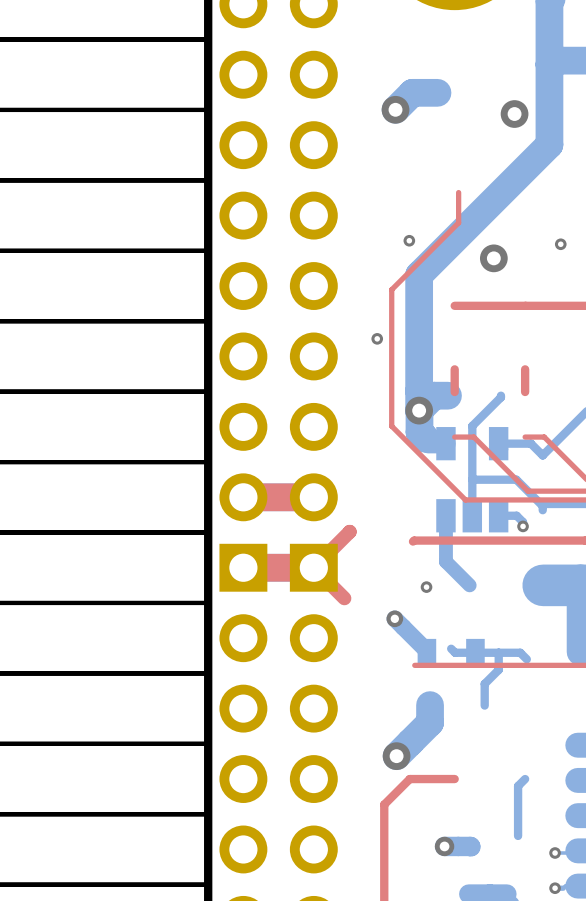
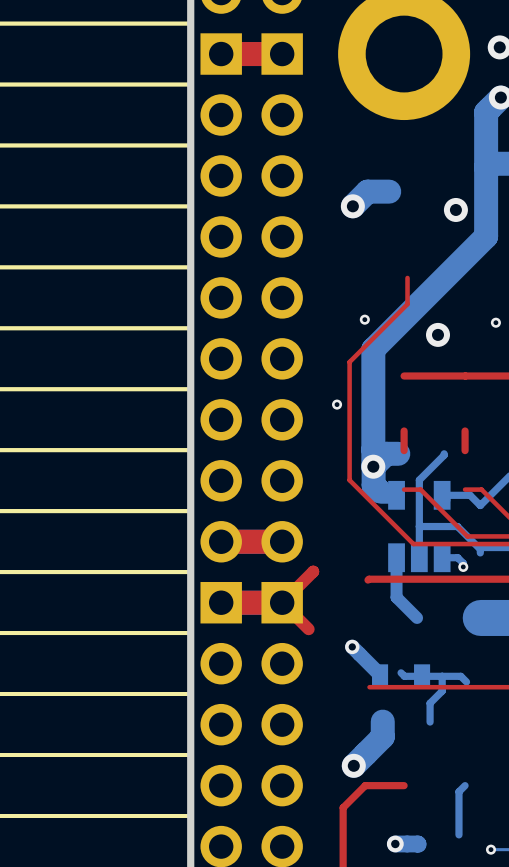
via: (426, 587) -> none

